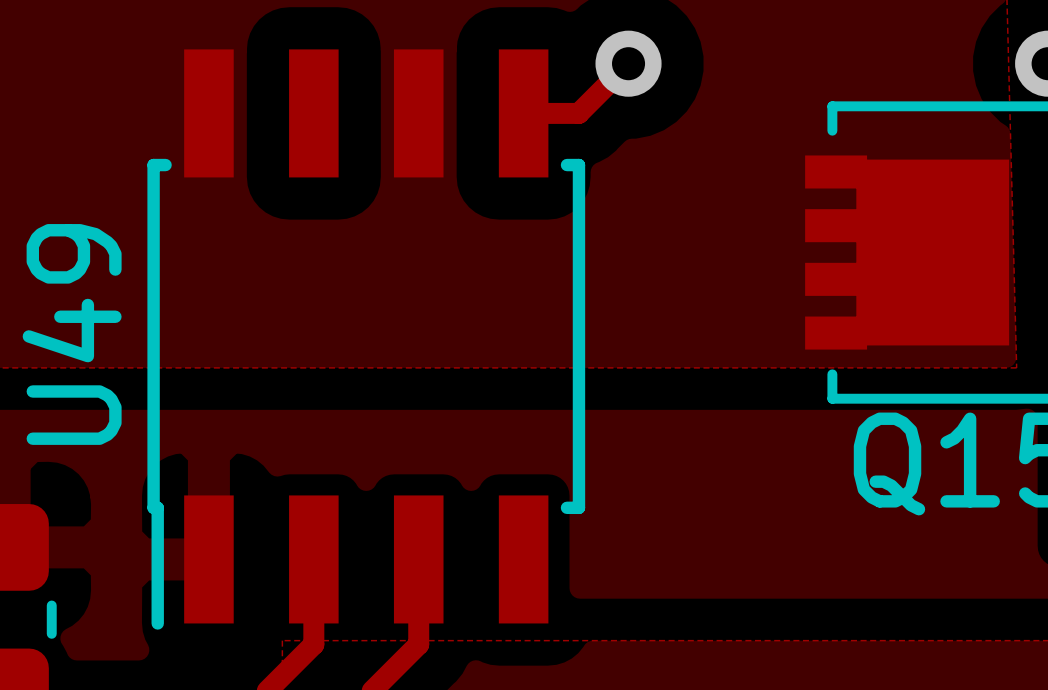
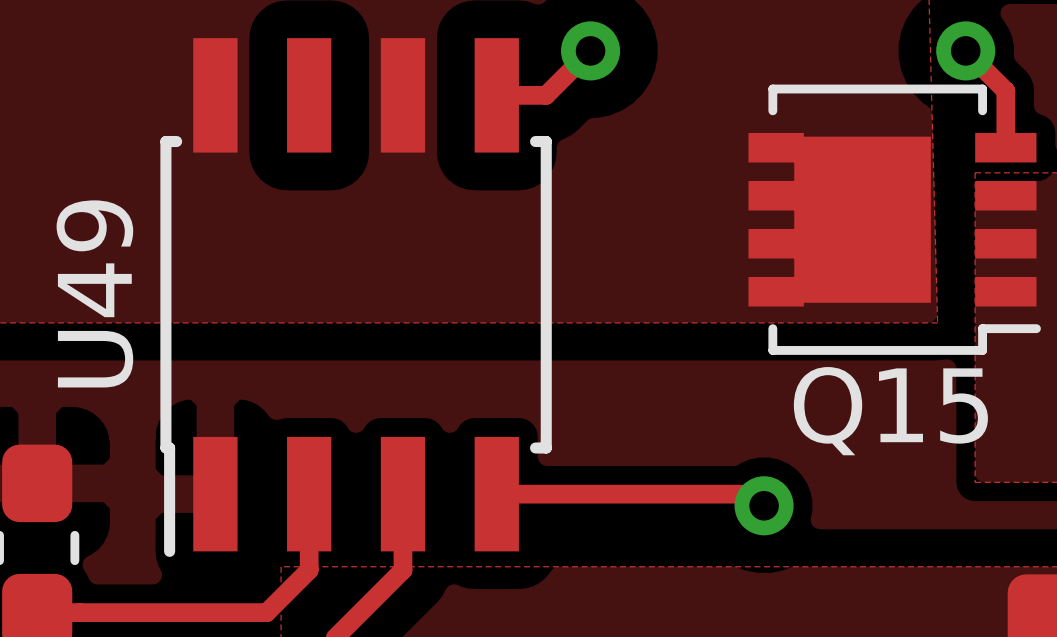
track: none -> (496, 494) (752, 494) (764, 505)
via: none -> (764, 505)

